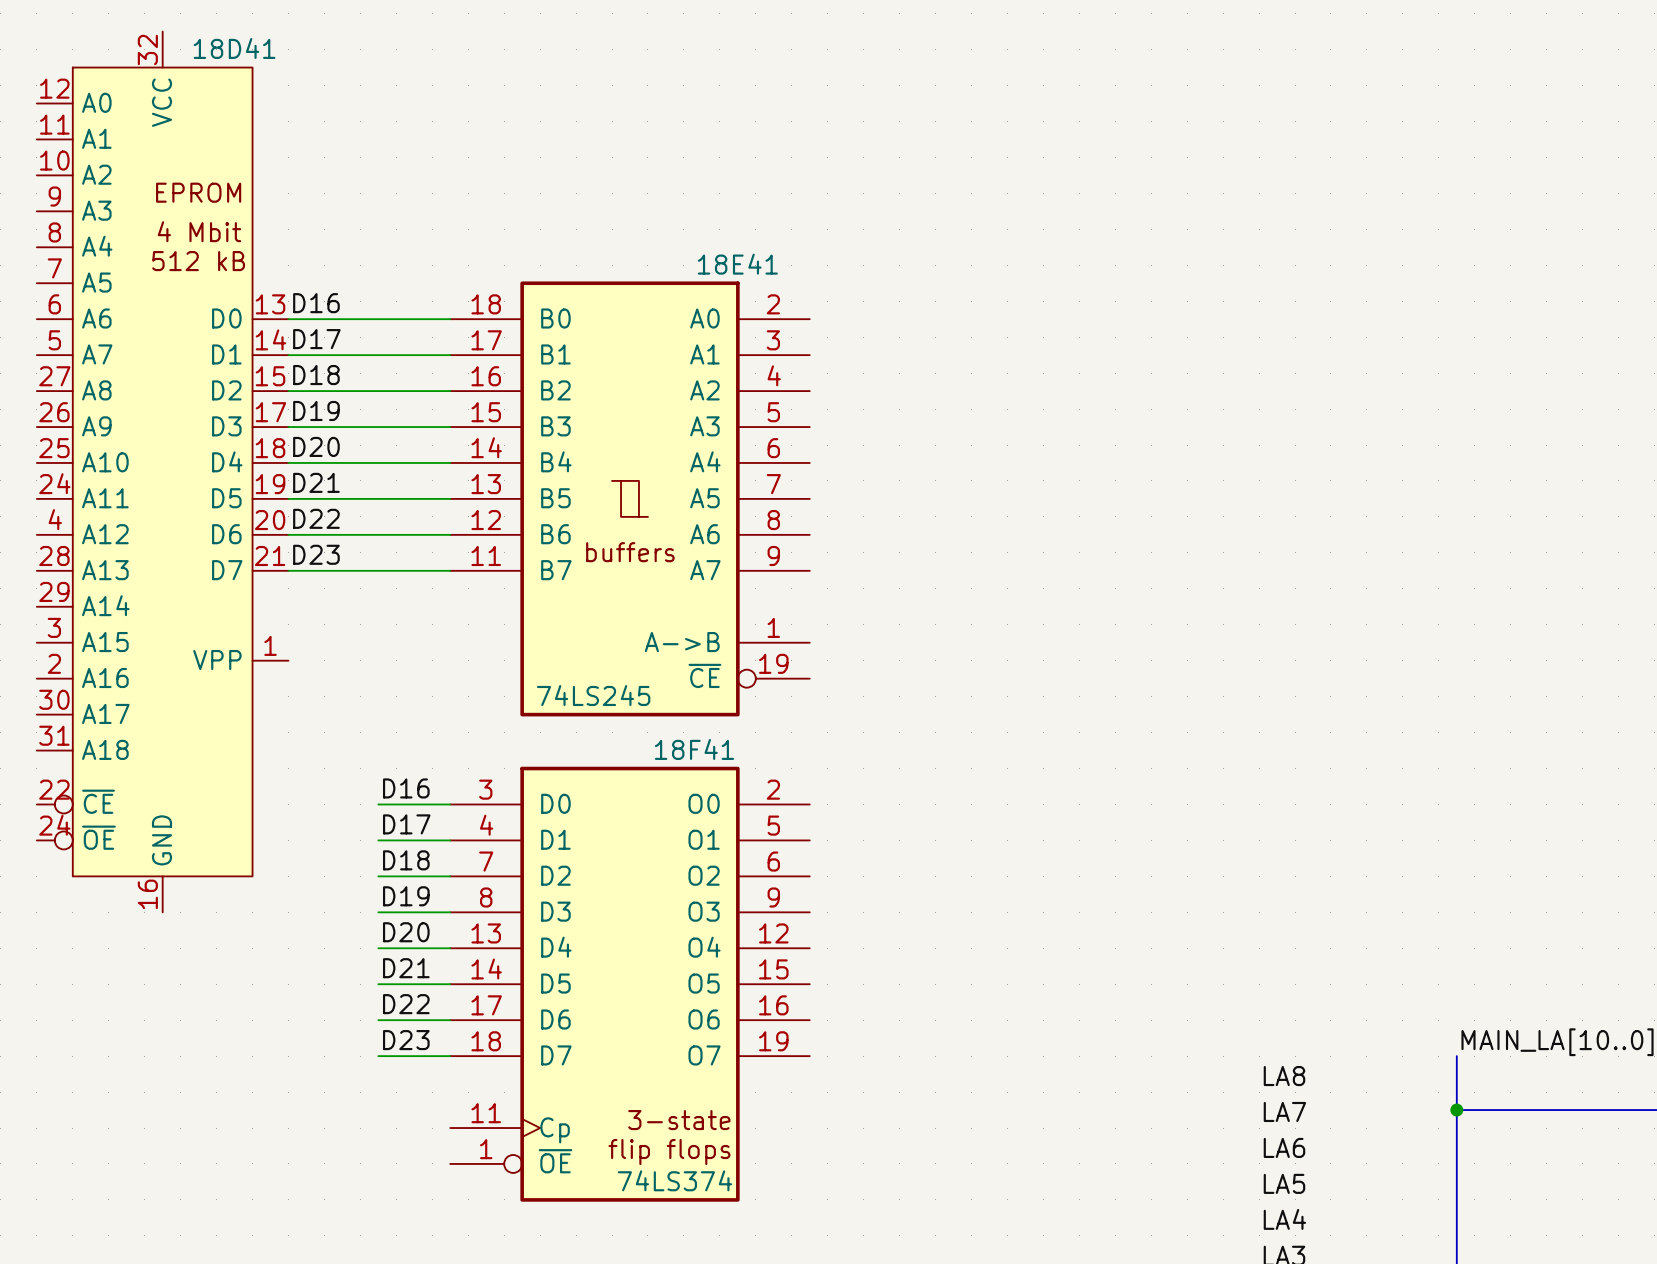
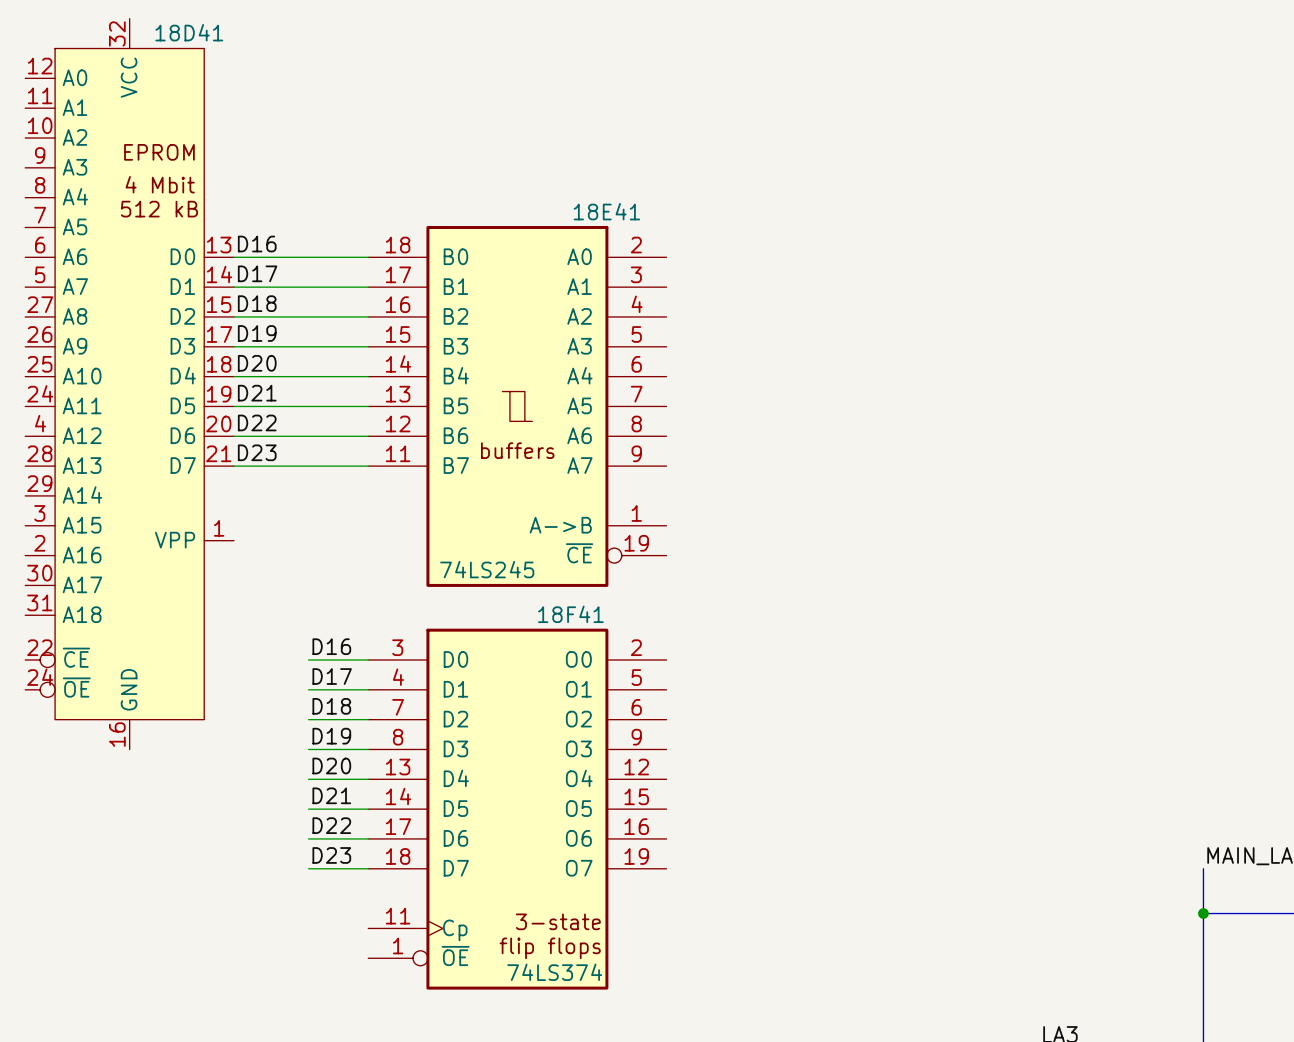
label: LA8 (1284, 1076) -> none
label: LA7 (1284, 1111) -> none
label: LA6 (1284, 1147) -> none
label: LA5 (1284, 1183) -> none
label: LA4 (1284, 1219) -> none

